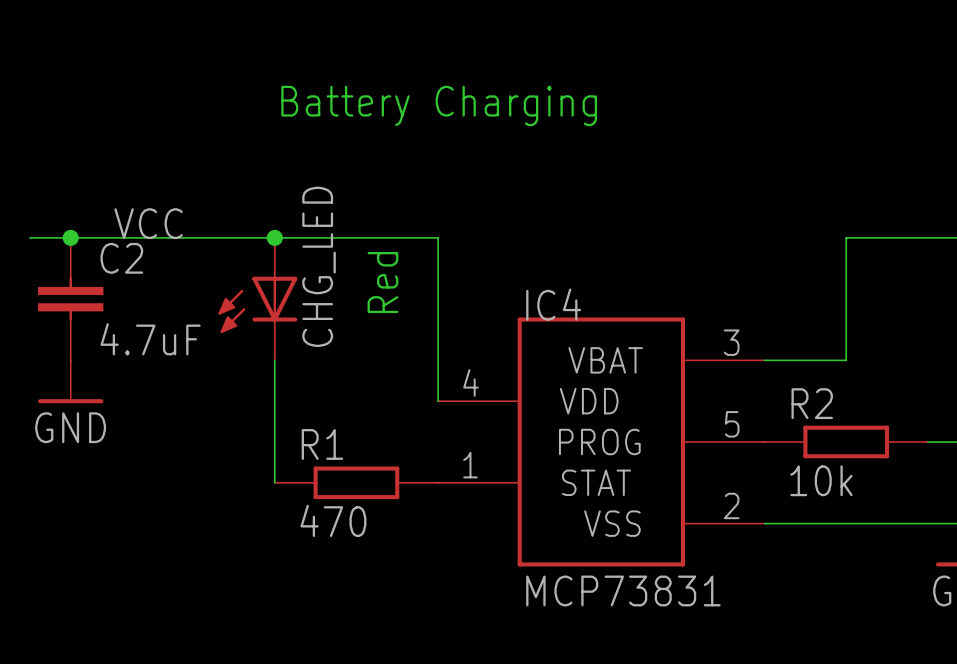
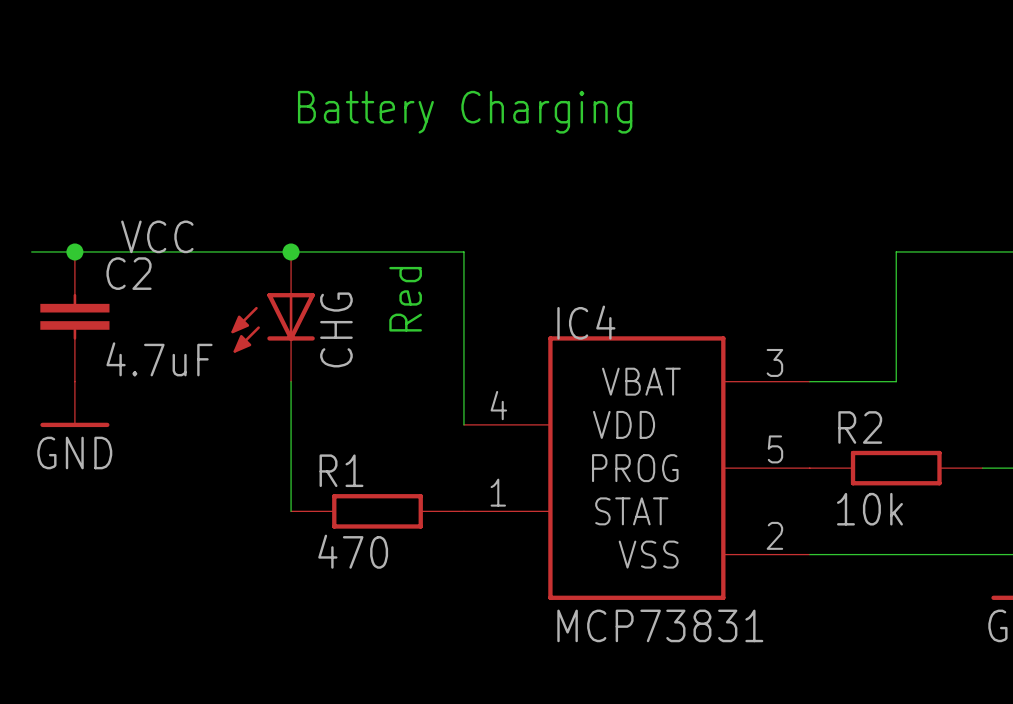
CHG_LED name: CHG_LED (319, 266) -> CHG (336, 329)

